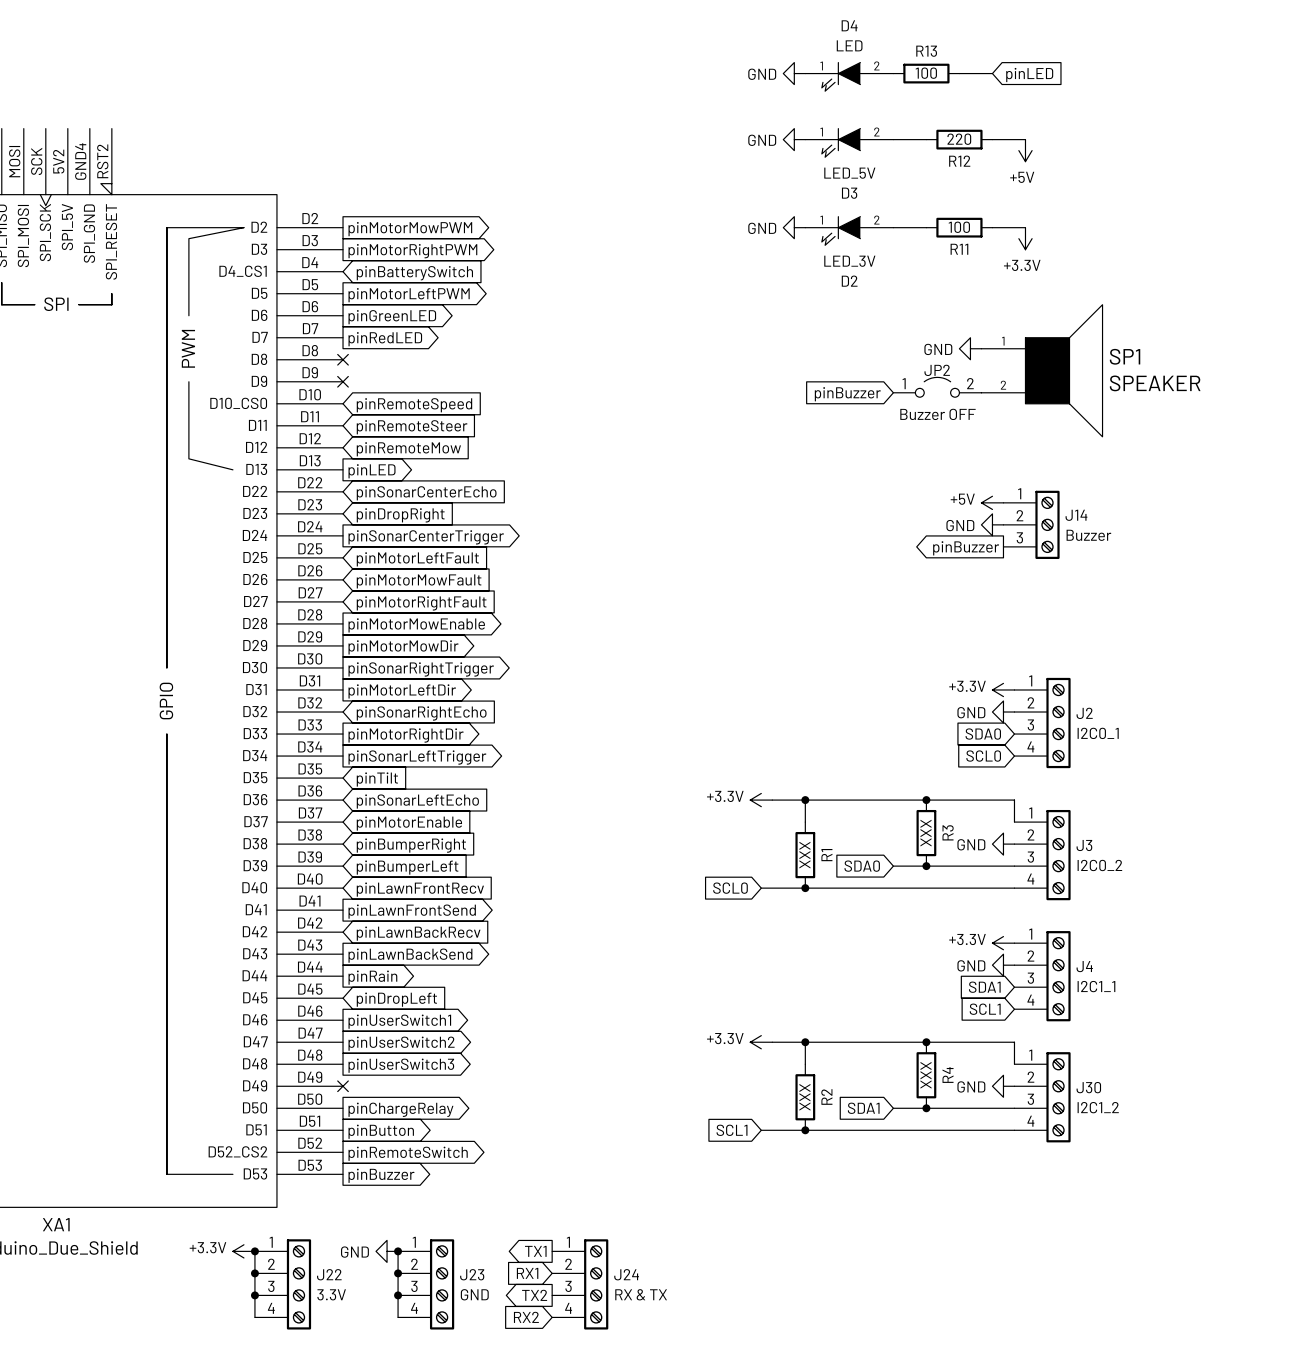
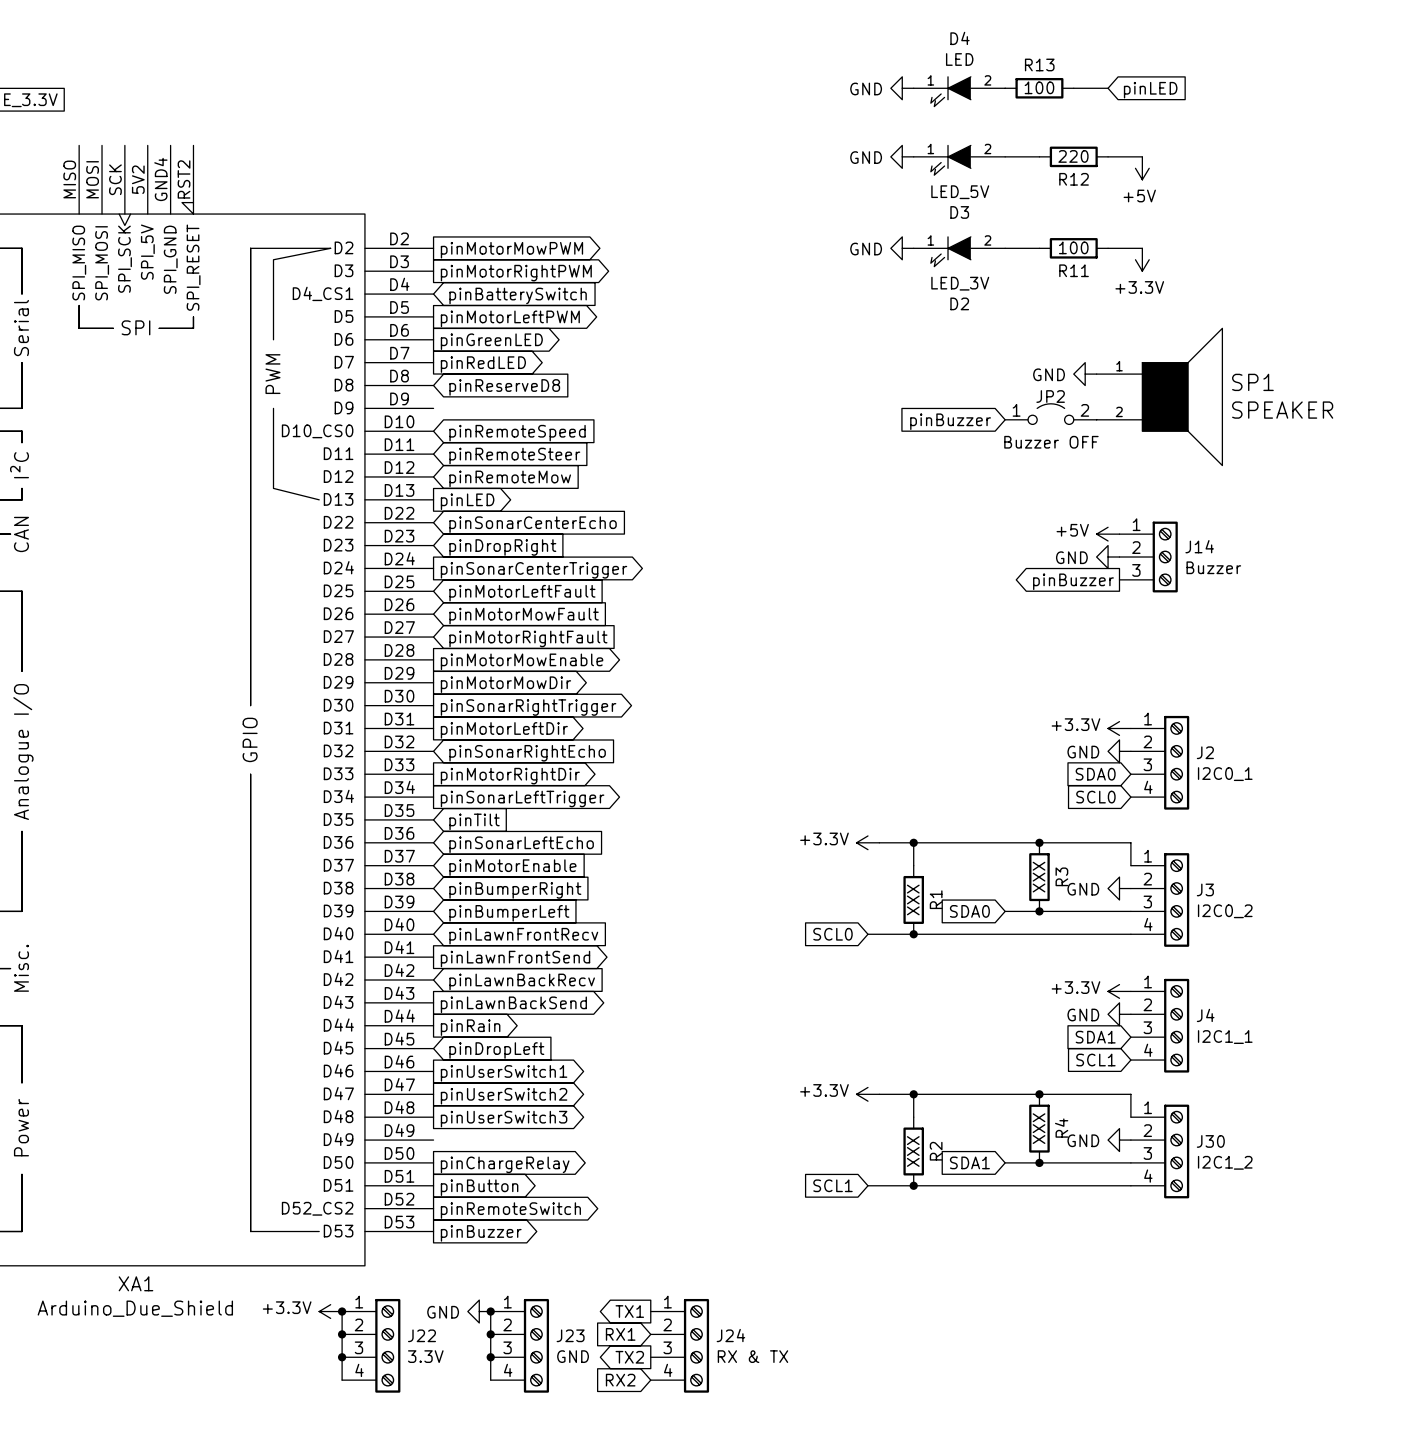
no-connect mark: (343, 359) -> none
global label: none -> pinReserveD8 (504, 387)
no-connect mark: (343, 381) -> none
no-connect mark: (343, 1086) -> none

